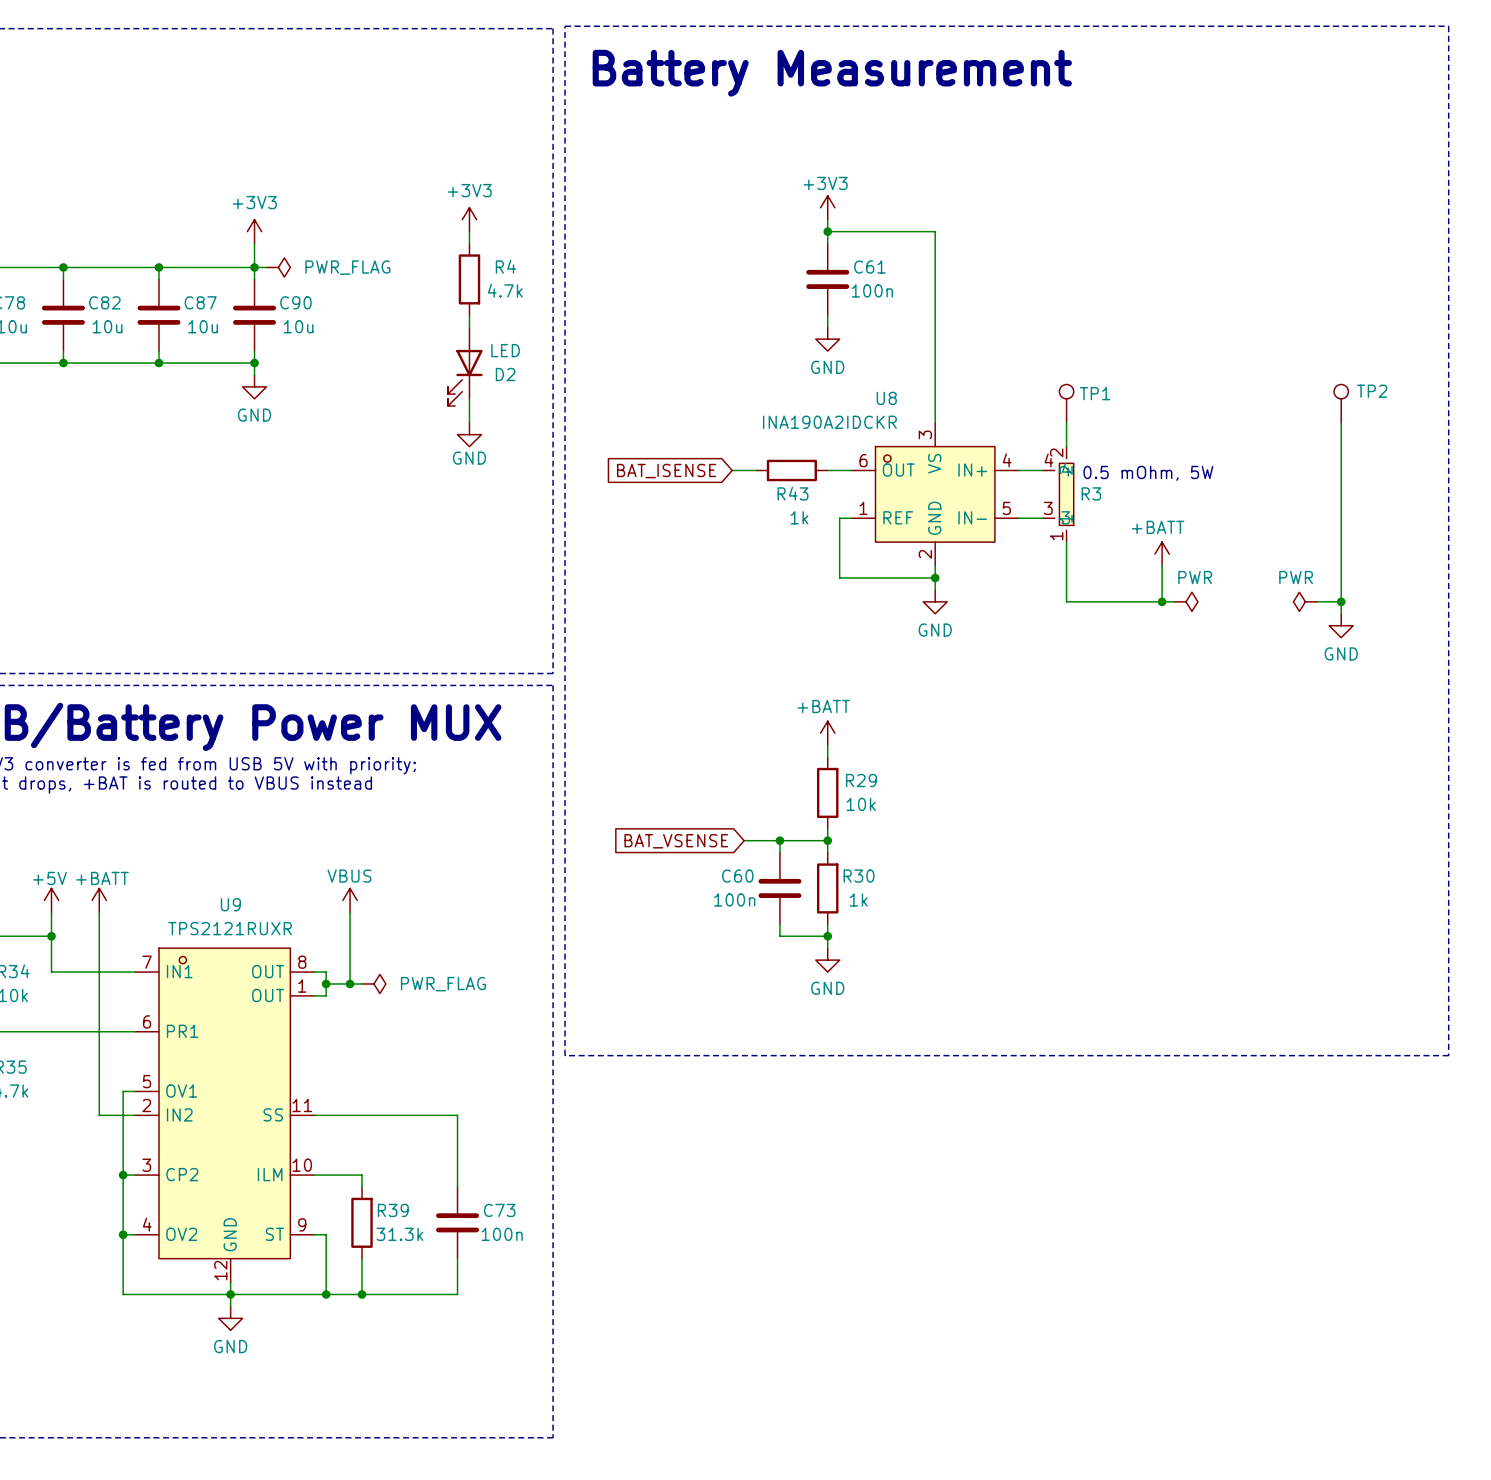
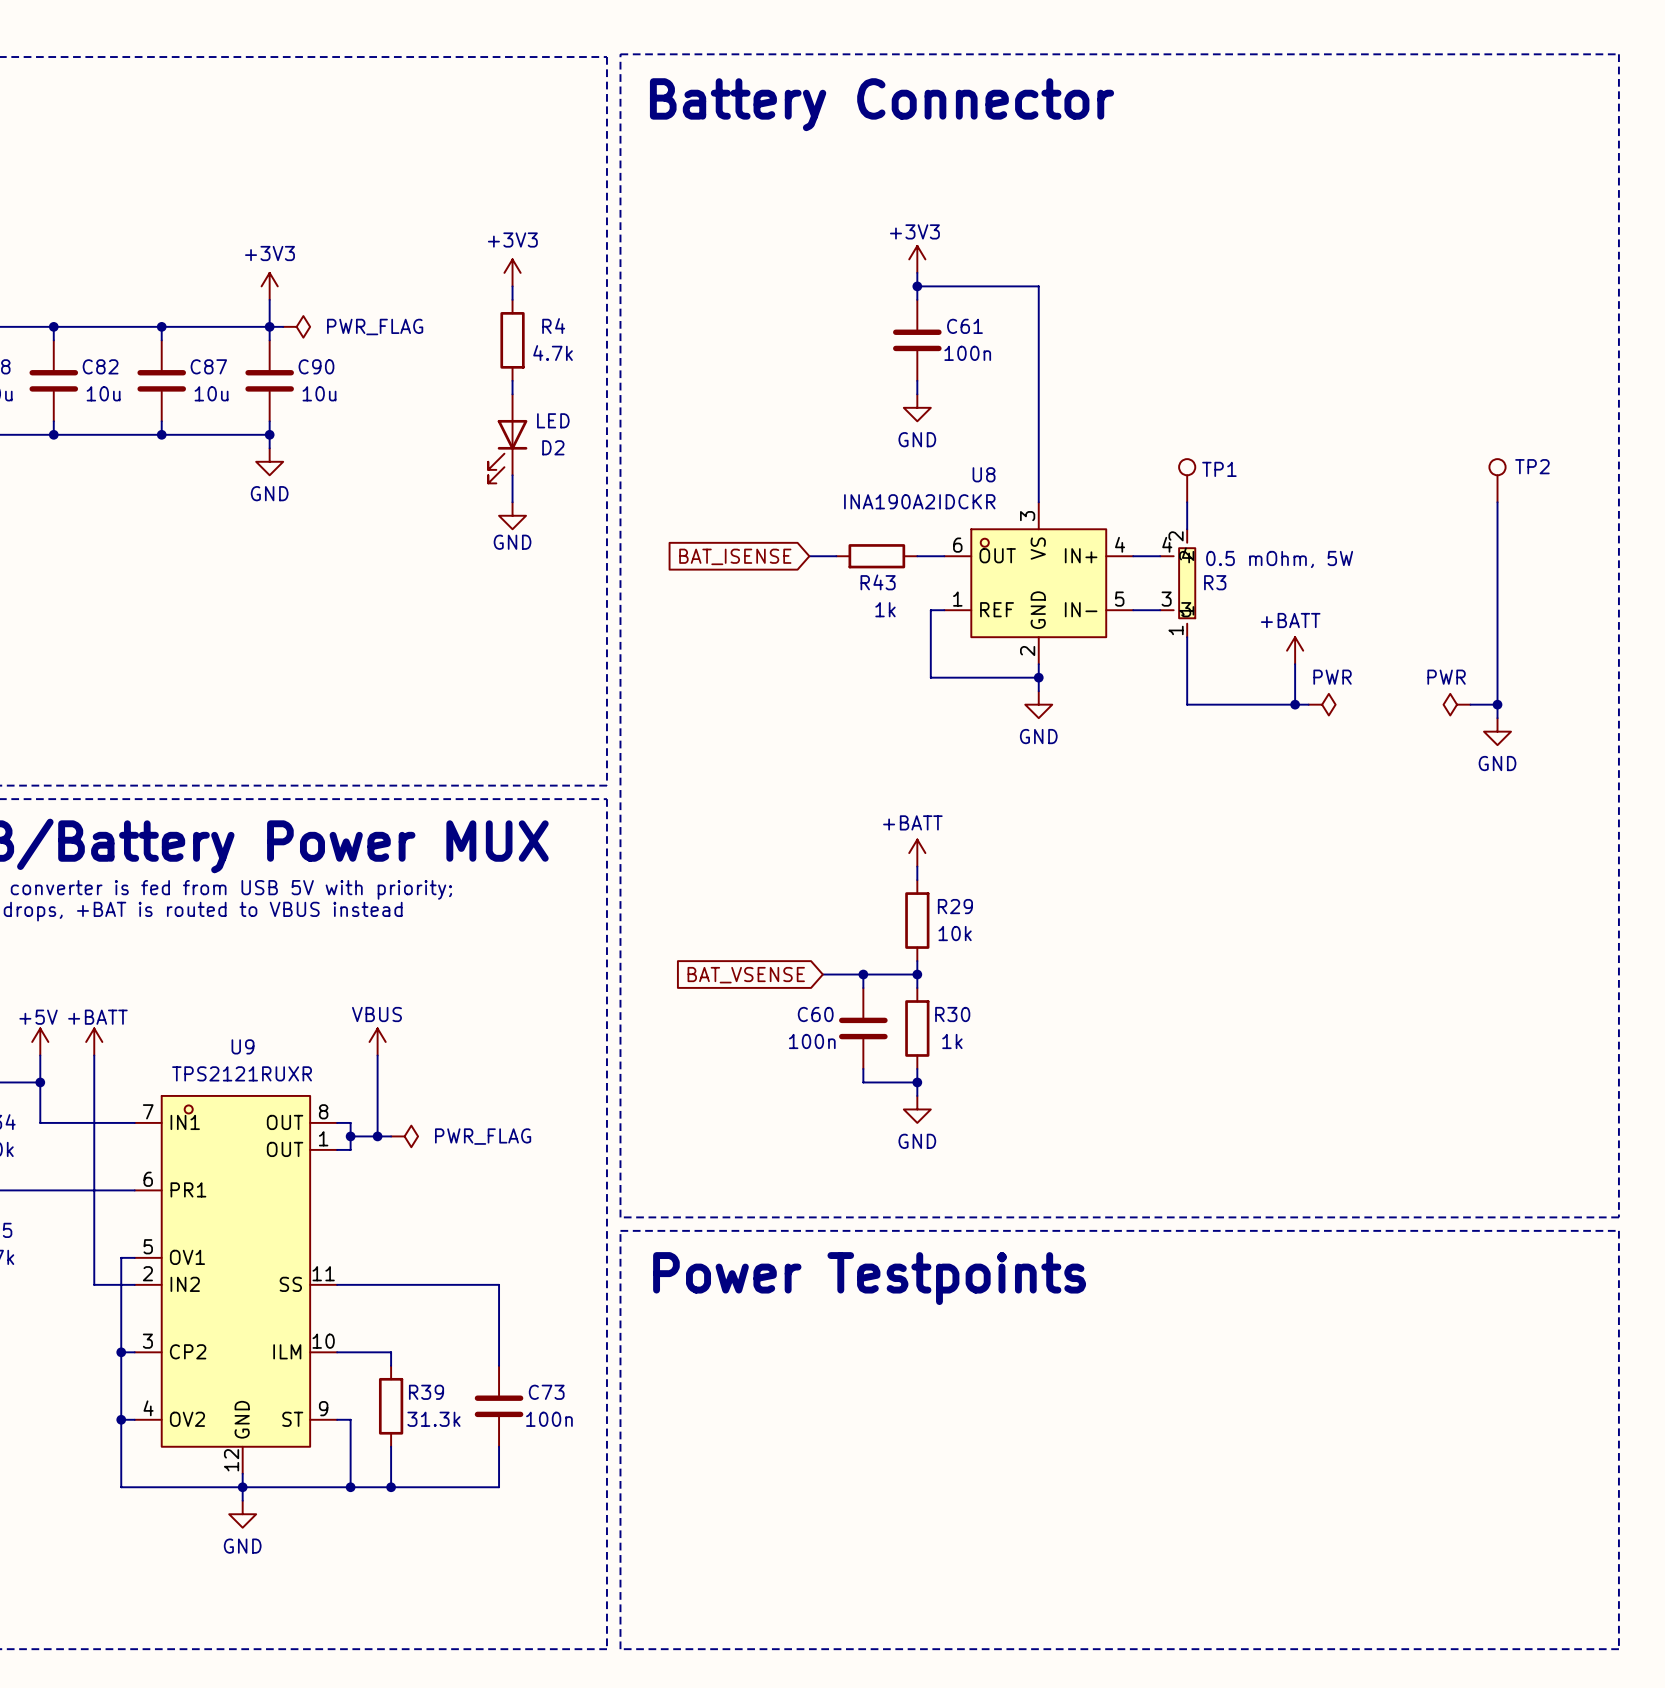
text: none -> Battery Connector (882, 104)
text: Battery Measurement (832, 73) -> none
line: none -> (620, 1230) (1618, 1230) (1618, 1649) (620, 1649) (620, 1230)
text: none -> Power Testpoints (869, 1278)

